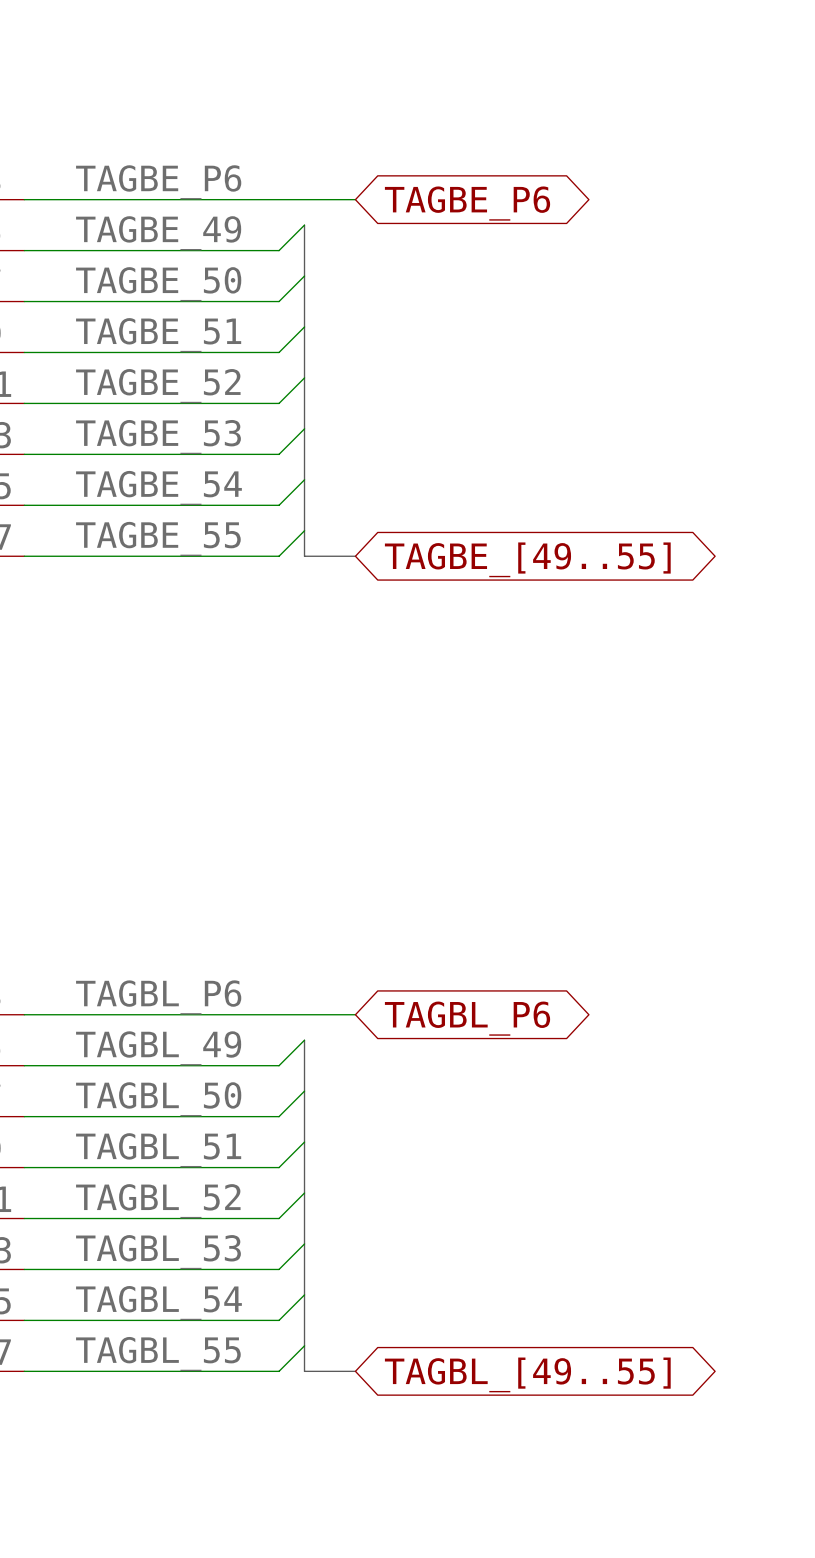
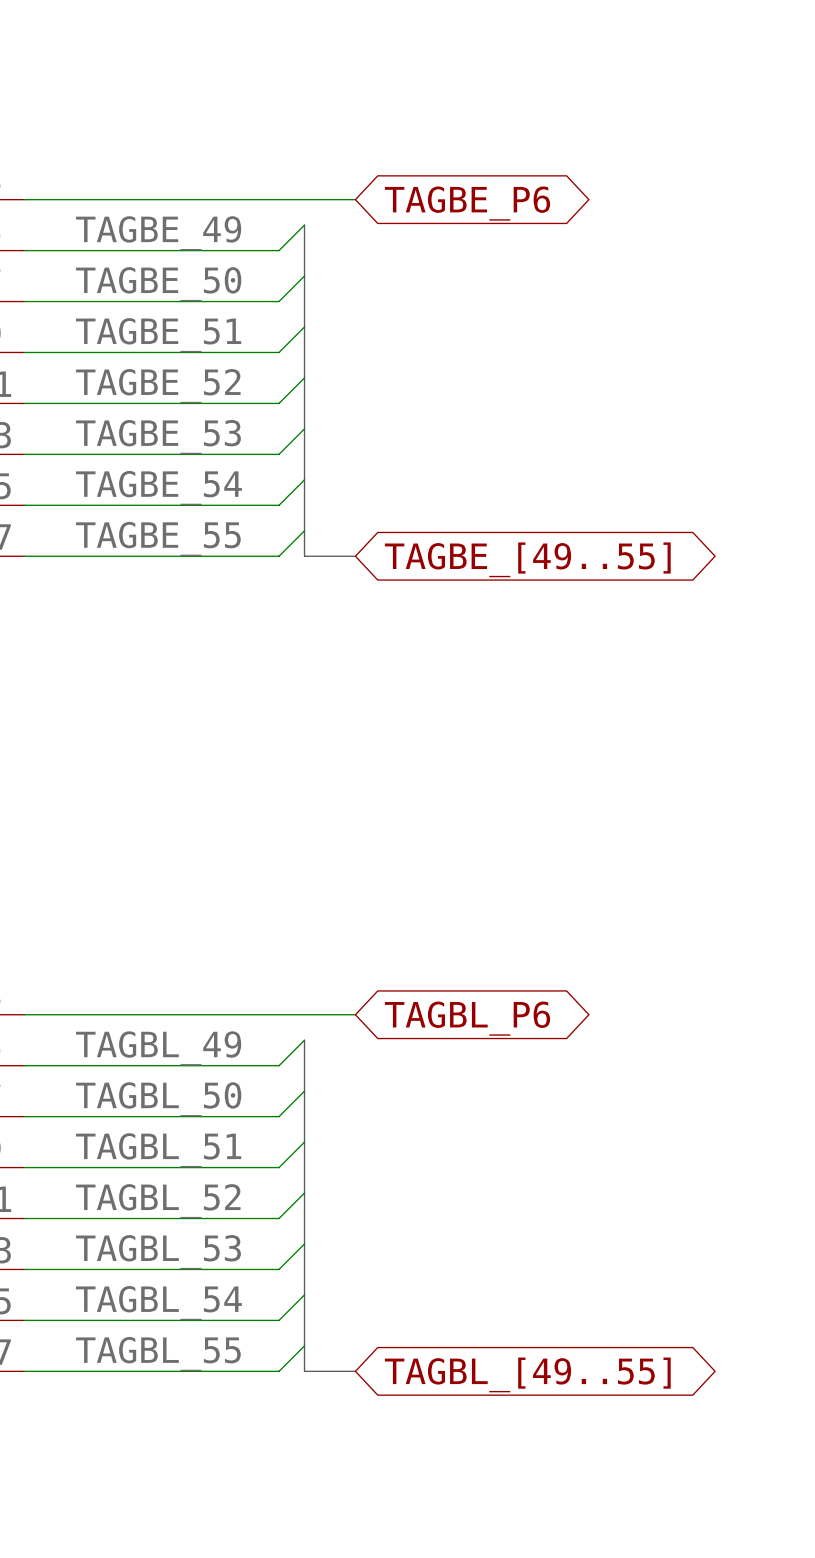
label: TAGBE_P6 (158, 182) -> none
label: TAGBL_P6 (158, 997) -> none

